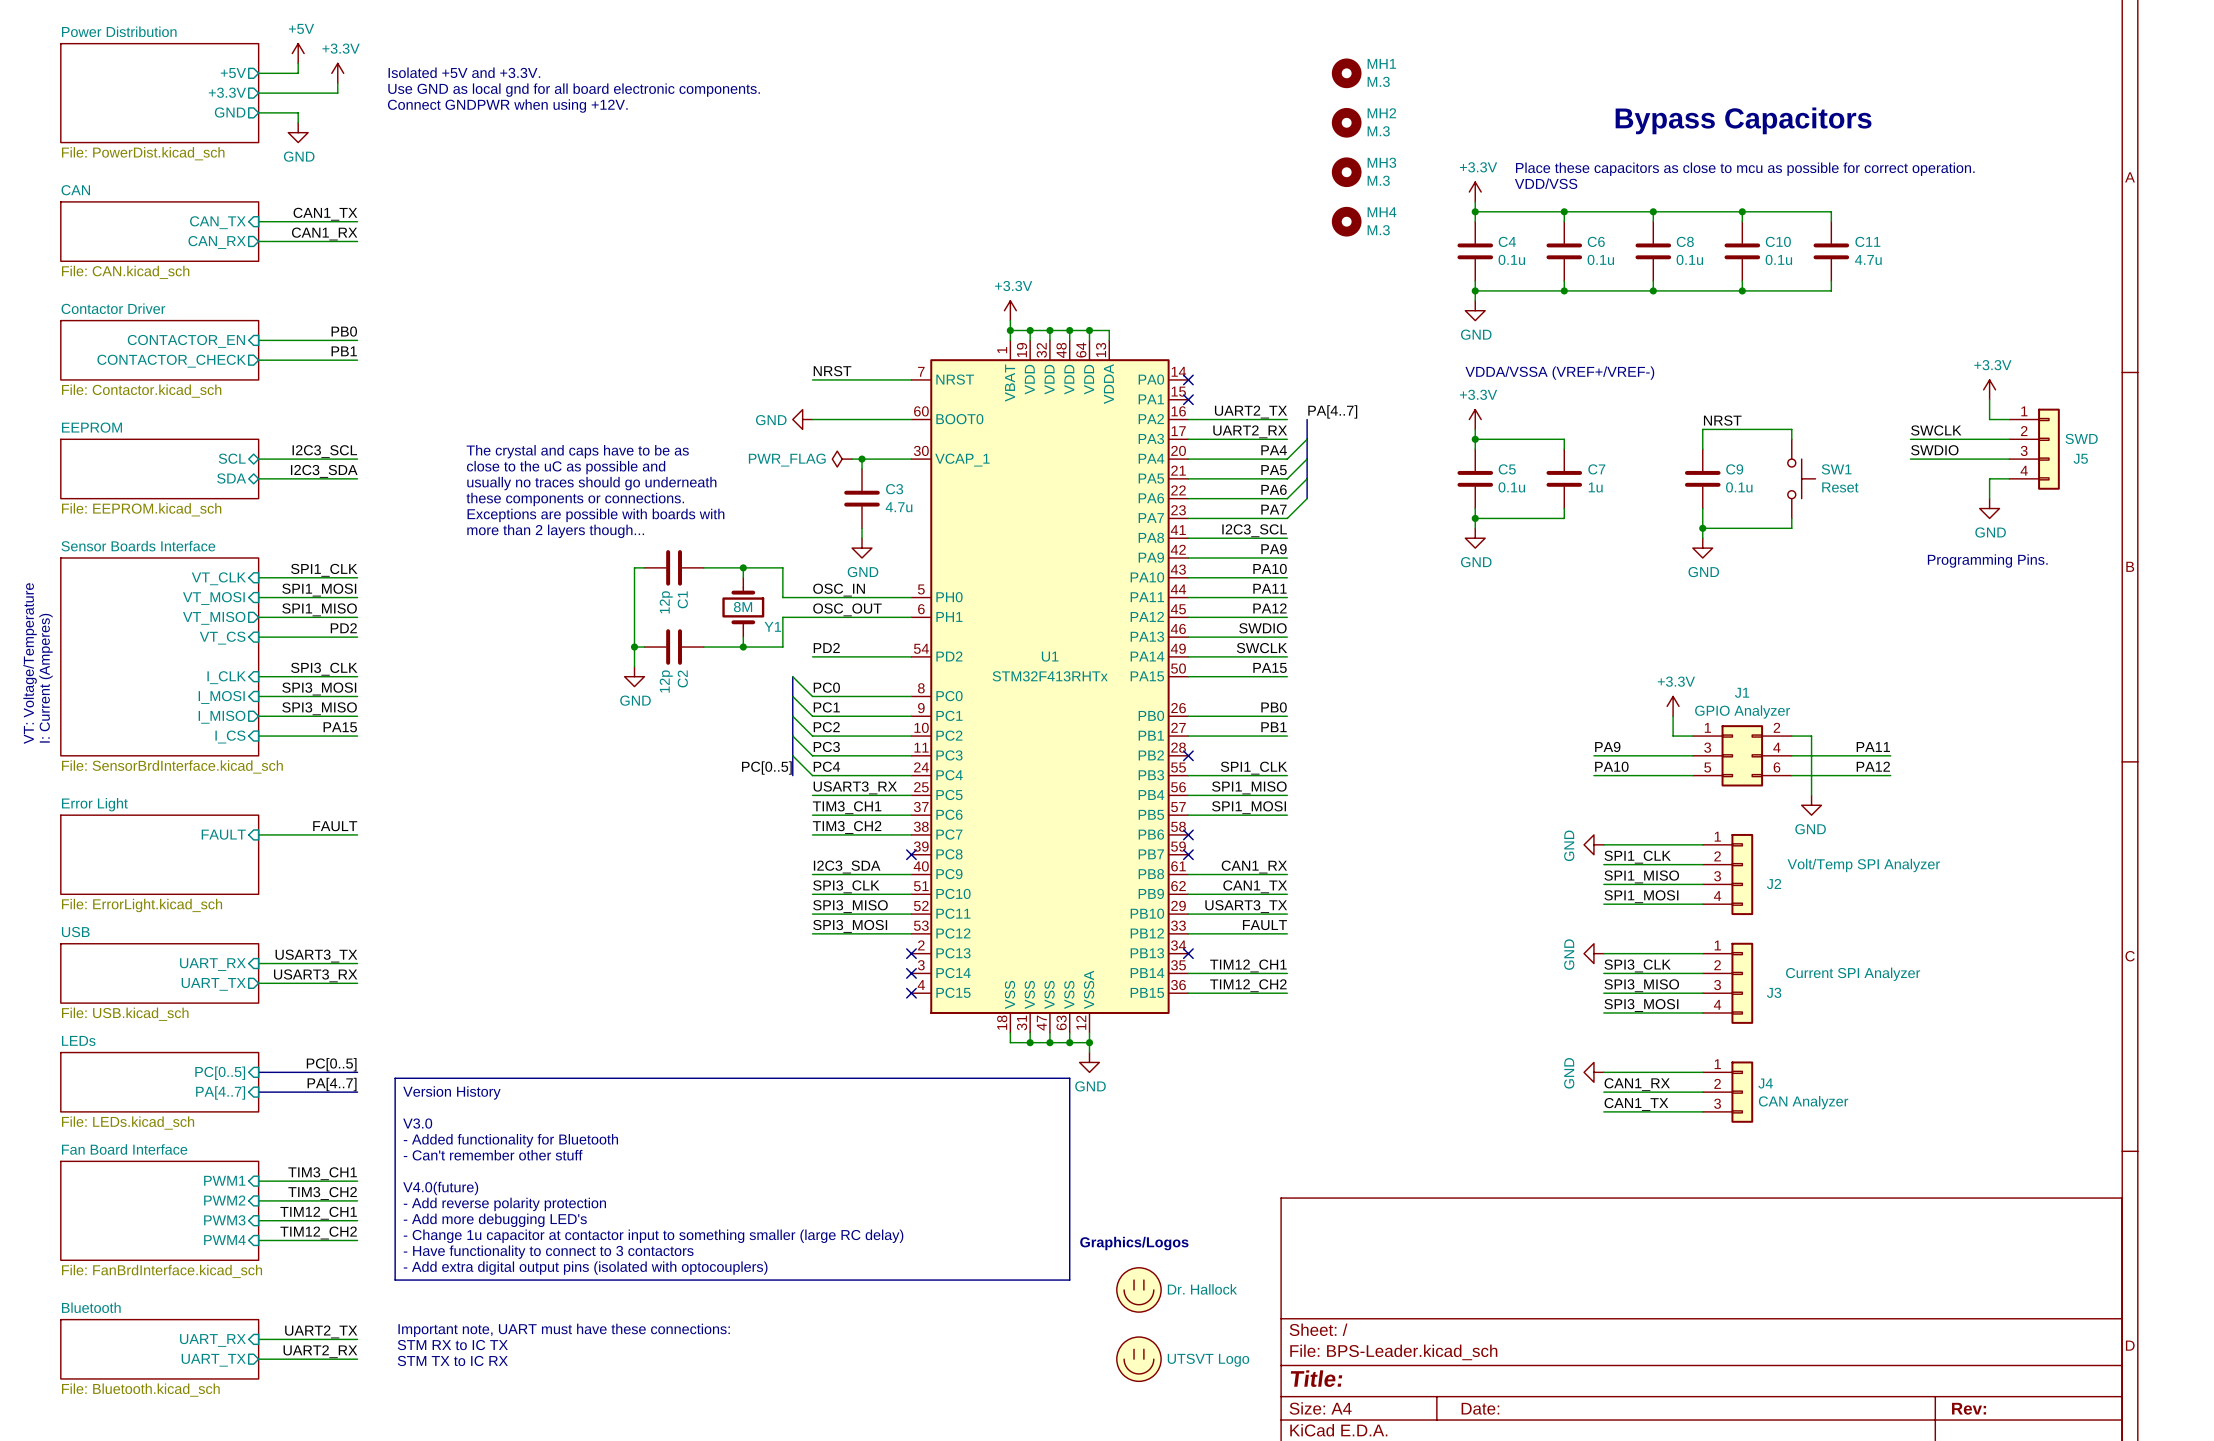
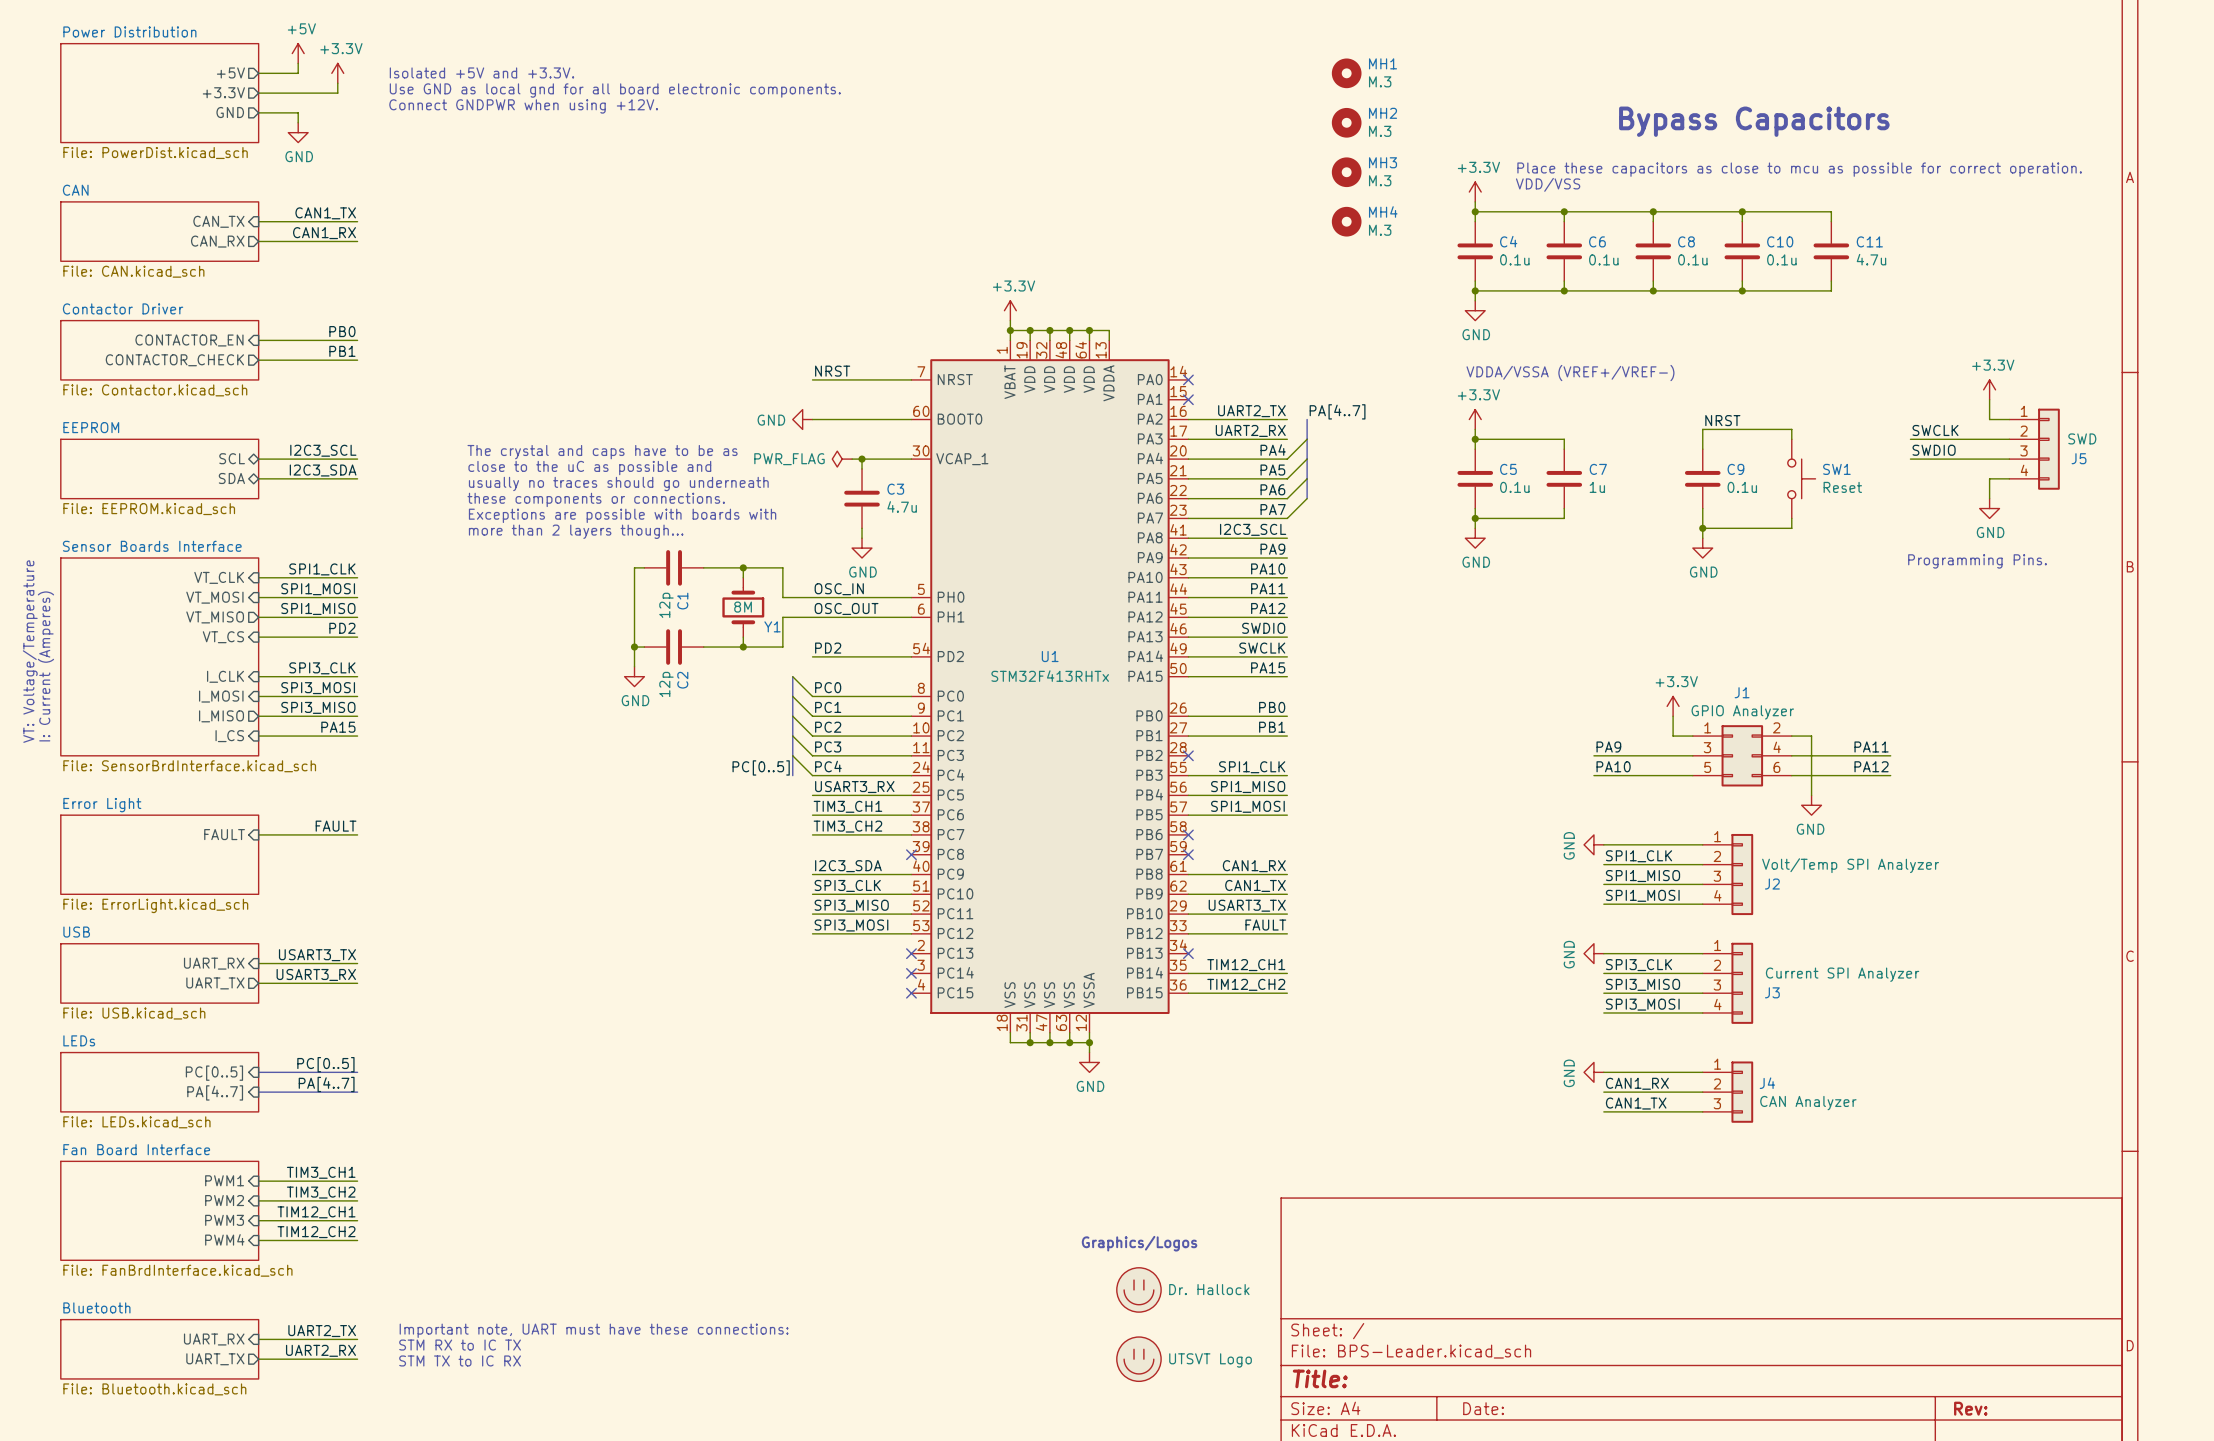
line: (395, 1078) (1069, 1078) (1069, 1280) (395, 1280) (395, 1078) -> none
text: Version History (451, 1092) -> none
text: V3.0 (417, 1123) -> none
text: - Added functionality for Bluetooth (510, 1140) -> none
text: - Can't remember other stuff (493, 1155) -> none
text: V4.0(future) (440, 1188) -> none
text: - Add reverse polarity protection (504, 1204) -> none
text: - Add more debugging LED's (495, 1220) -> none
text: - Change 1u capacitor at contactor input to something smaller (large RC delay) (653, 1236) -> none
text: - Have functionality to connect to 3 contactors (548, 1252) -> none
text: - Add extra digital output pins (isolated with optocouplers) (585, 1268) -> none

